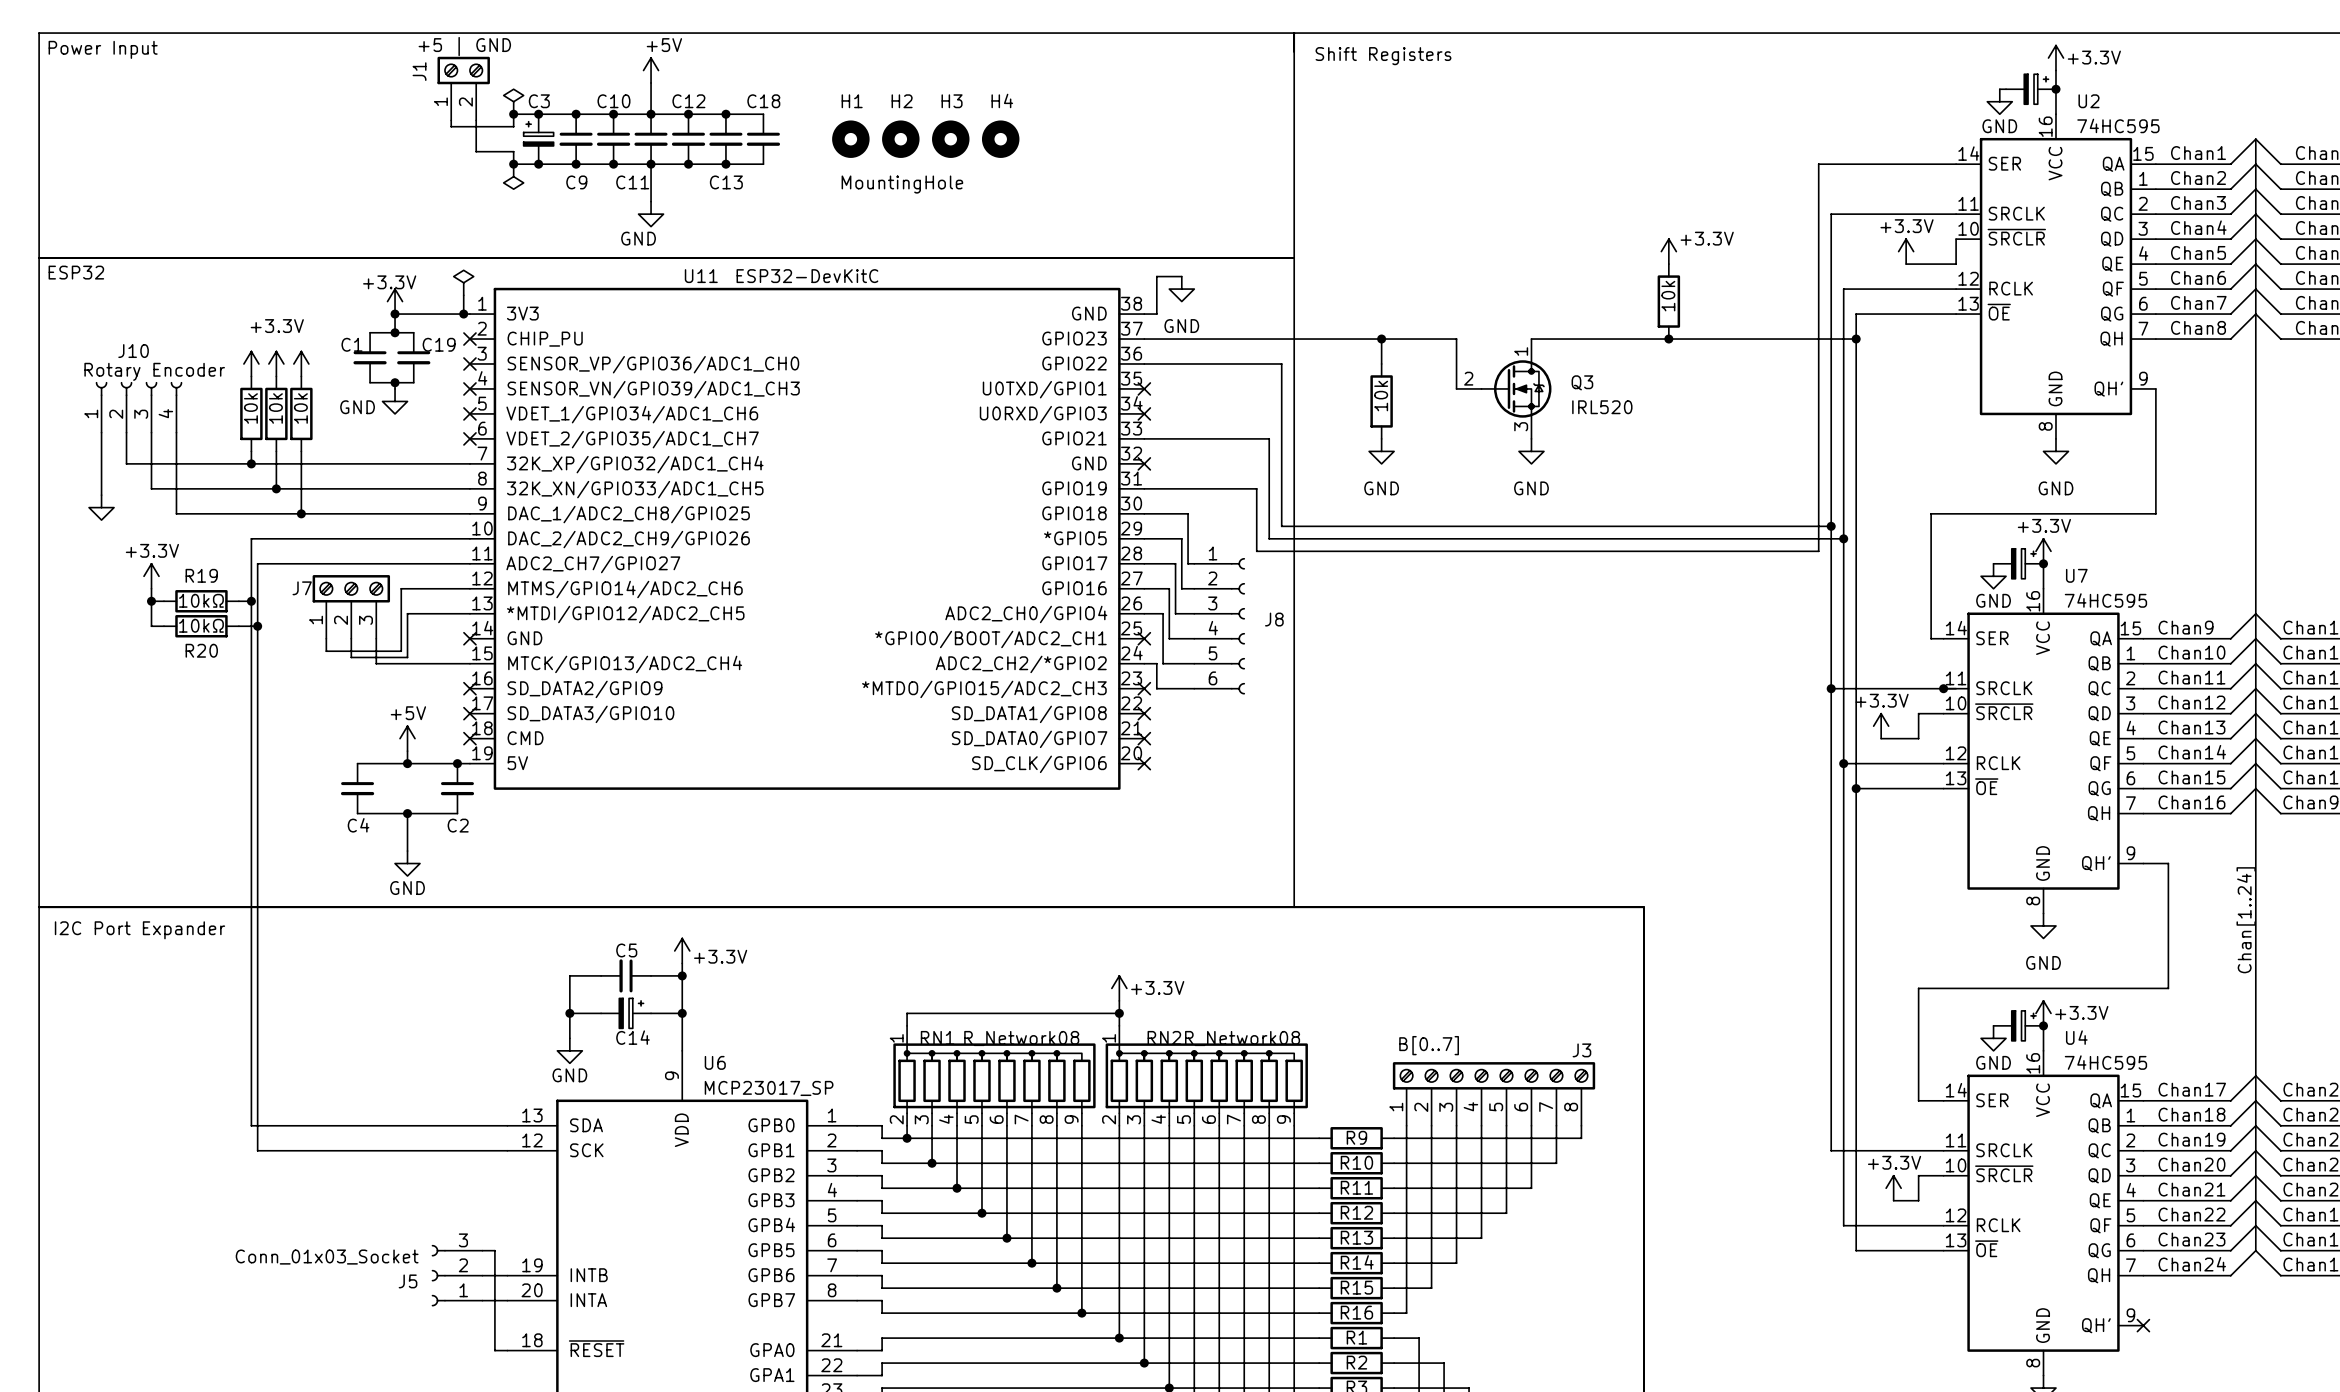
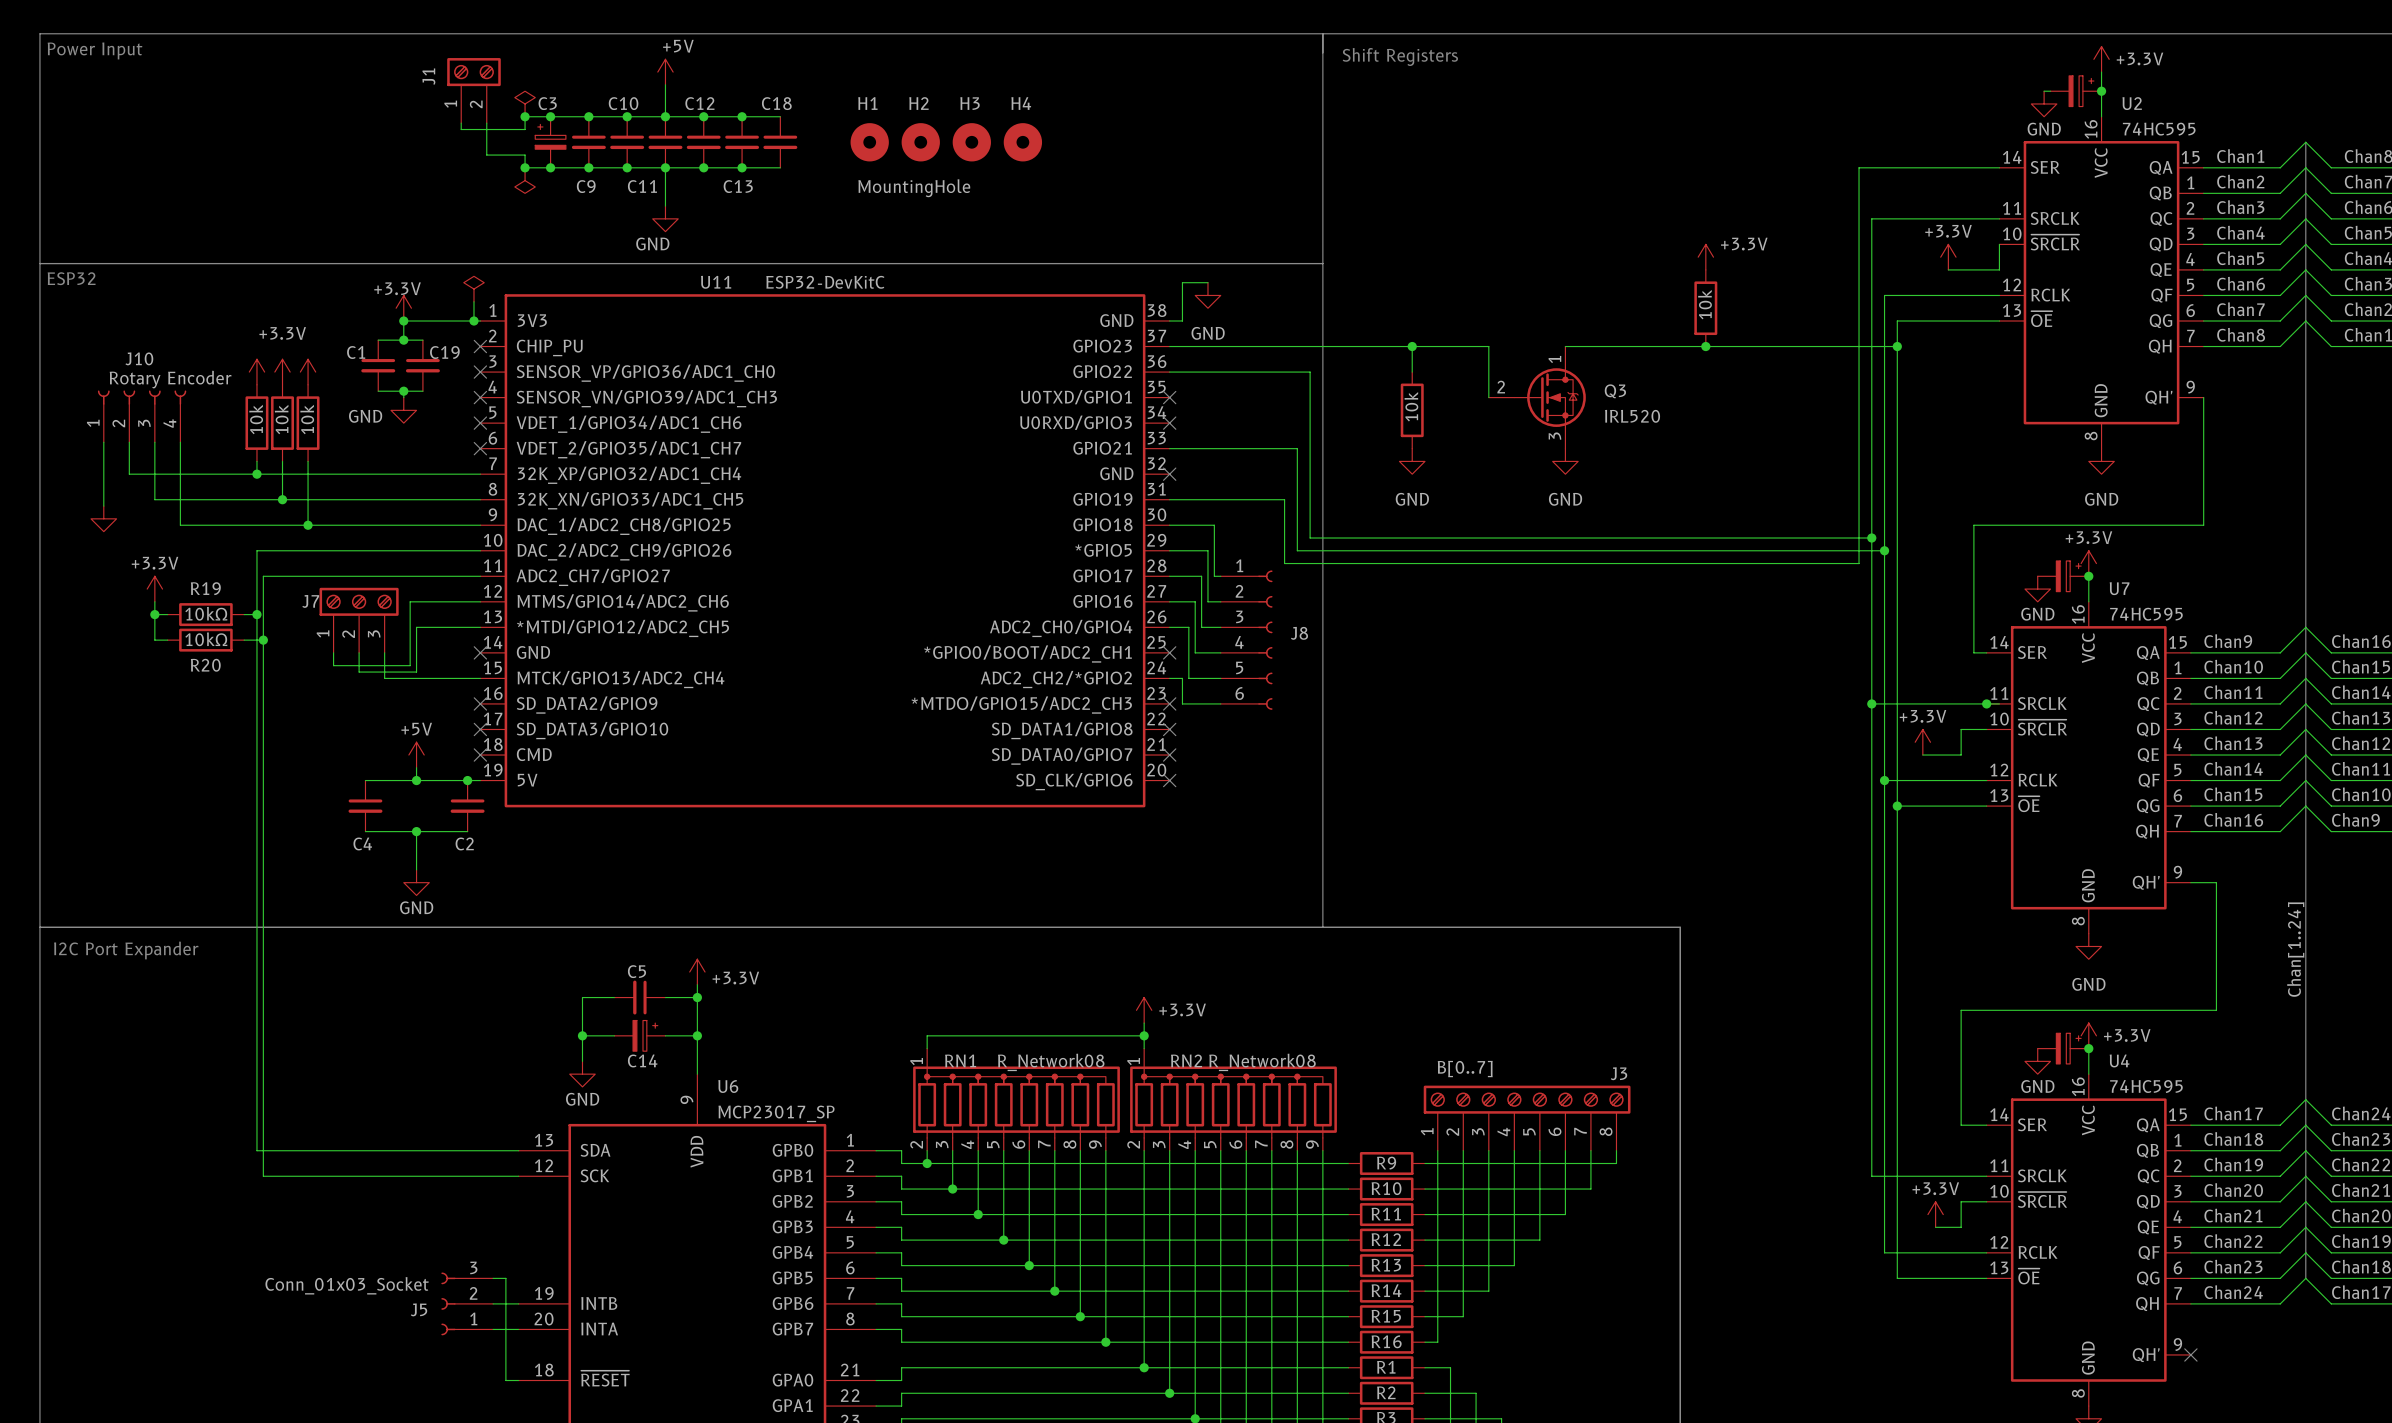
J1 value: +5 | GND (464, 46) -> none

